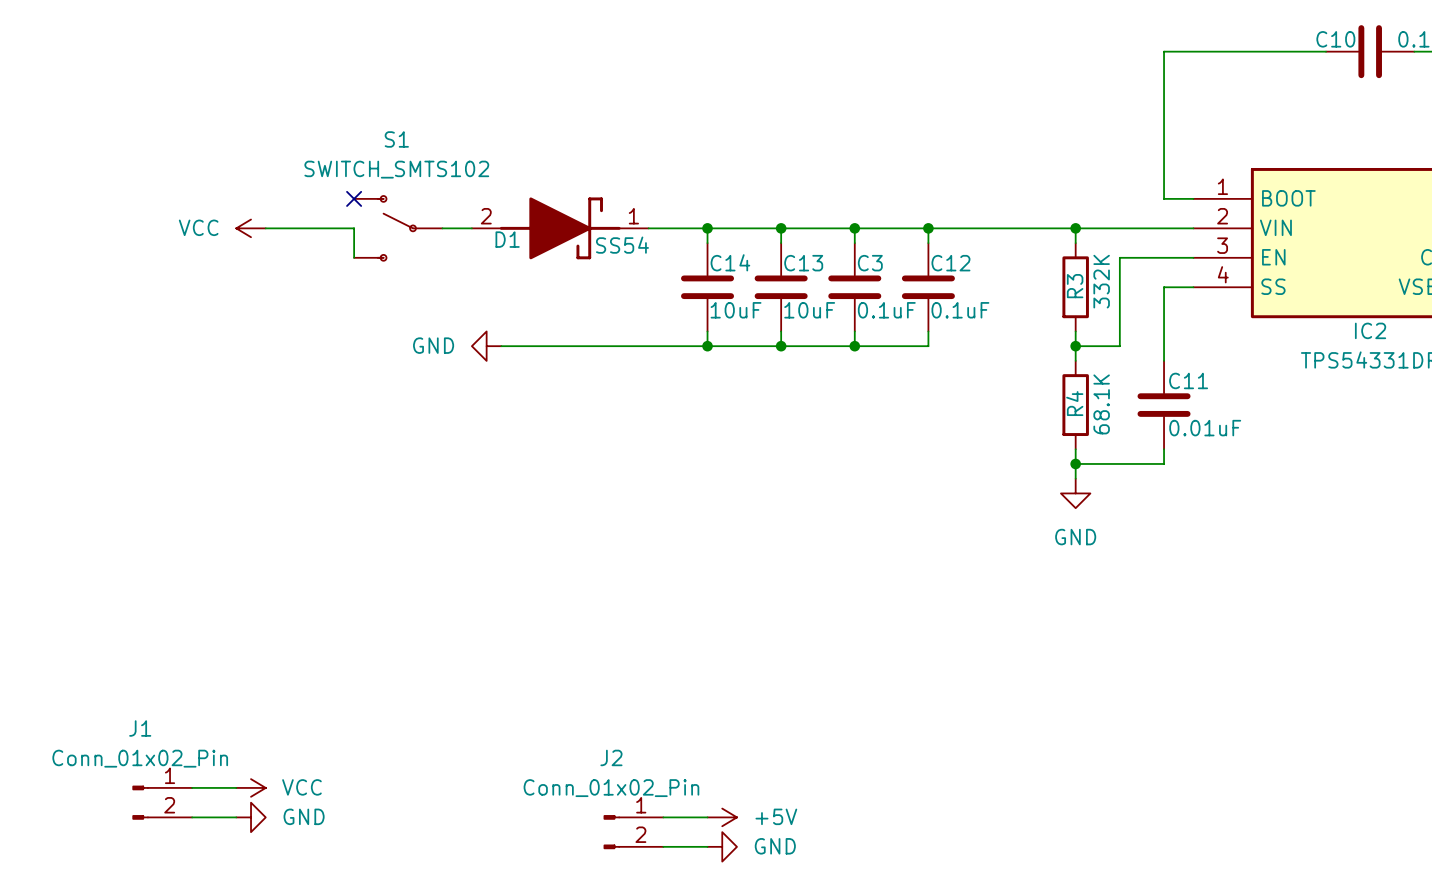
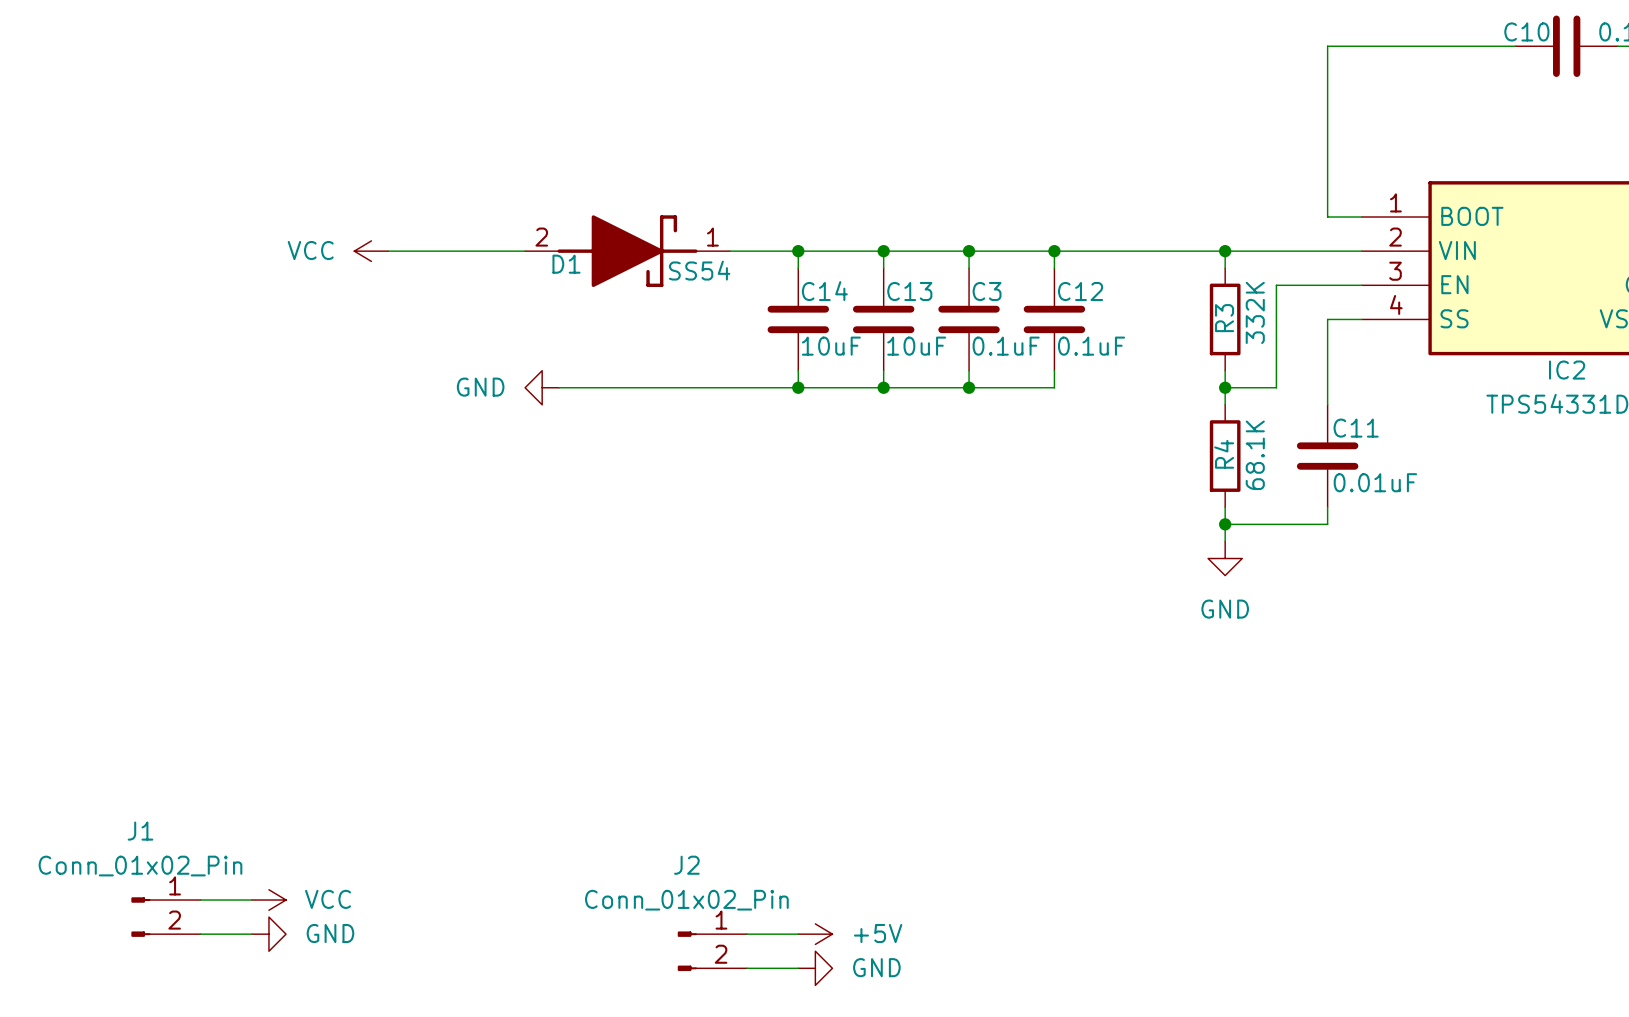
no-connect mark: (354, 198) -> none
power symbol position: VCC (251, 228) -> VCC (371, 251)
wire: (265, 228) (354, 228) (354, 257) -> none
wire: none -> (388, 251) (490, 251)
S1: SWITCH_SMTS102 (398, 228) -> none

